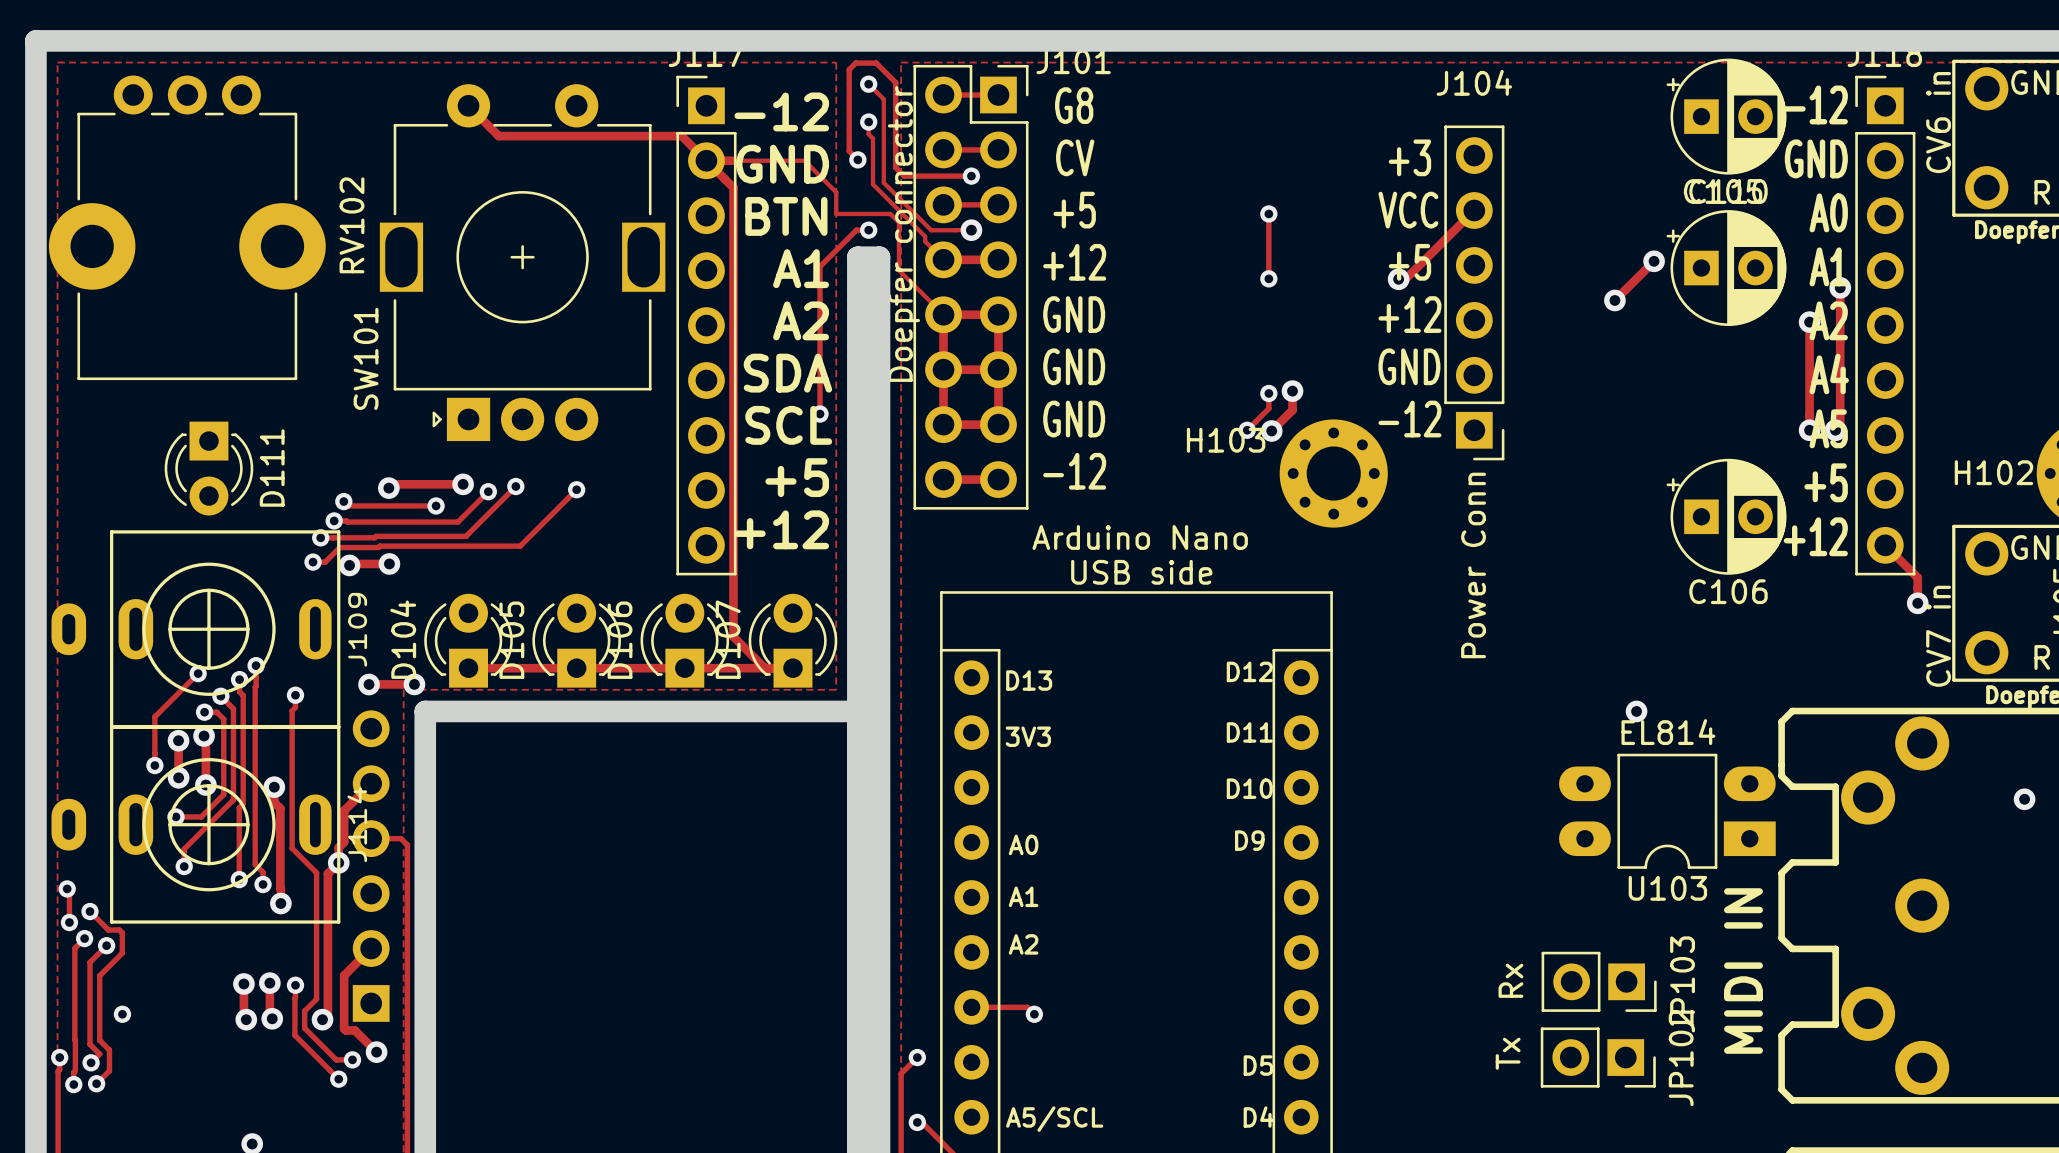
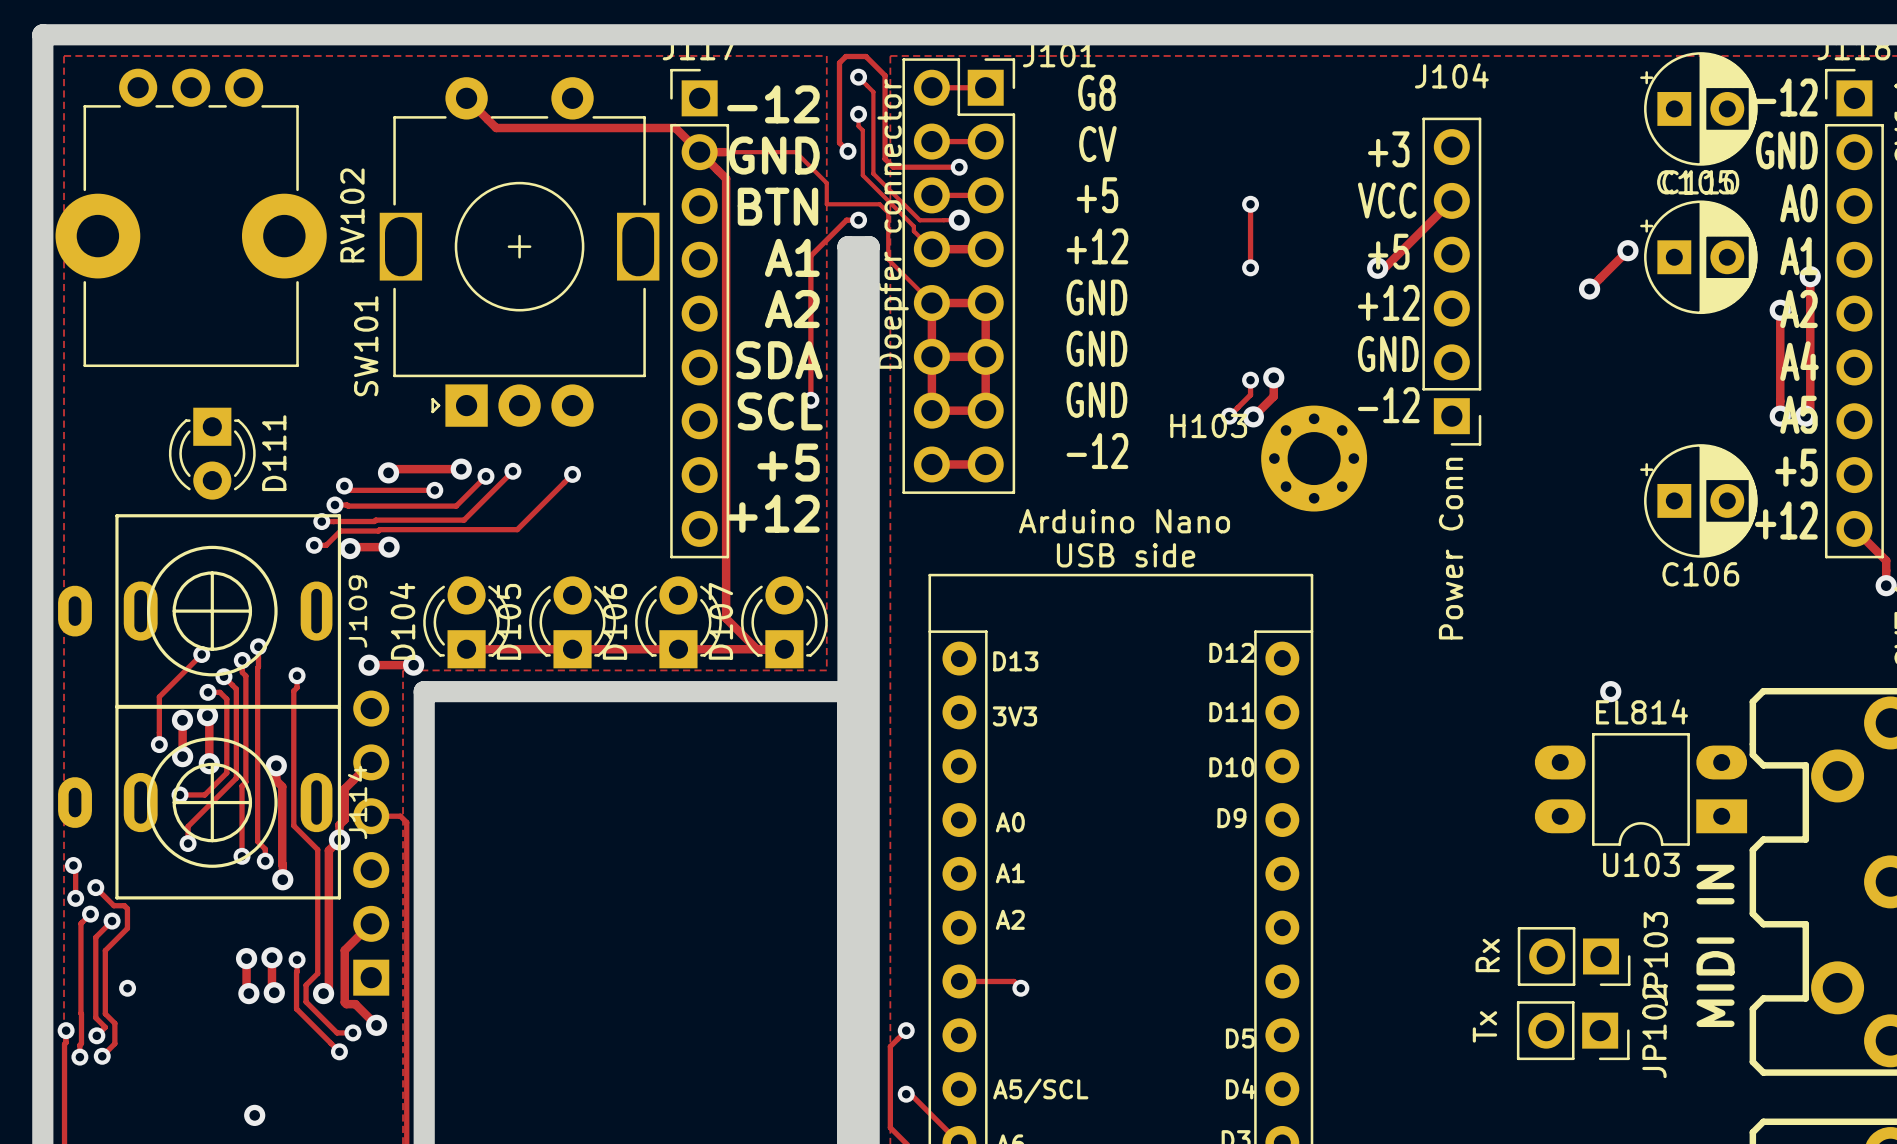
text position: G8 (1074, 105) -> G8 (1096, 92)
text position: CV (1075, 157) -> CV (1097, 144)
text position: +5 (1074, 210) -> +5 (1097, 195)
text position: +12 (1074, 262) -> +12 (1097, 246)
text: none -> GND (1096, 297)
text: GND (1074, 314) -> none
text: none -> GND (1096, 348)
text: GND (1074, 366) -> none
text: none -> GND (1096, 399)
text: GND (1074, 419) -> none
text position: -12 (1074, 471) -> -12 (1097, 451)

